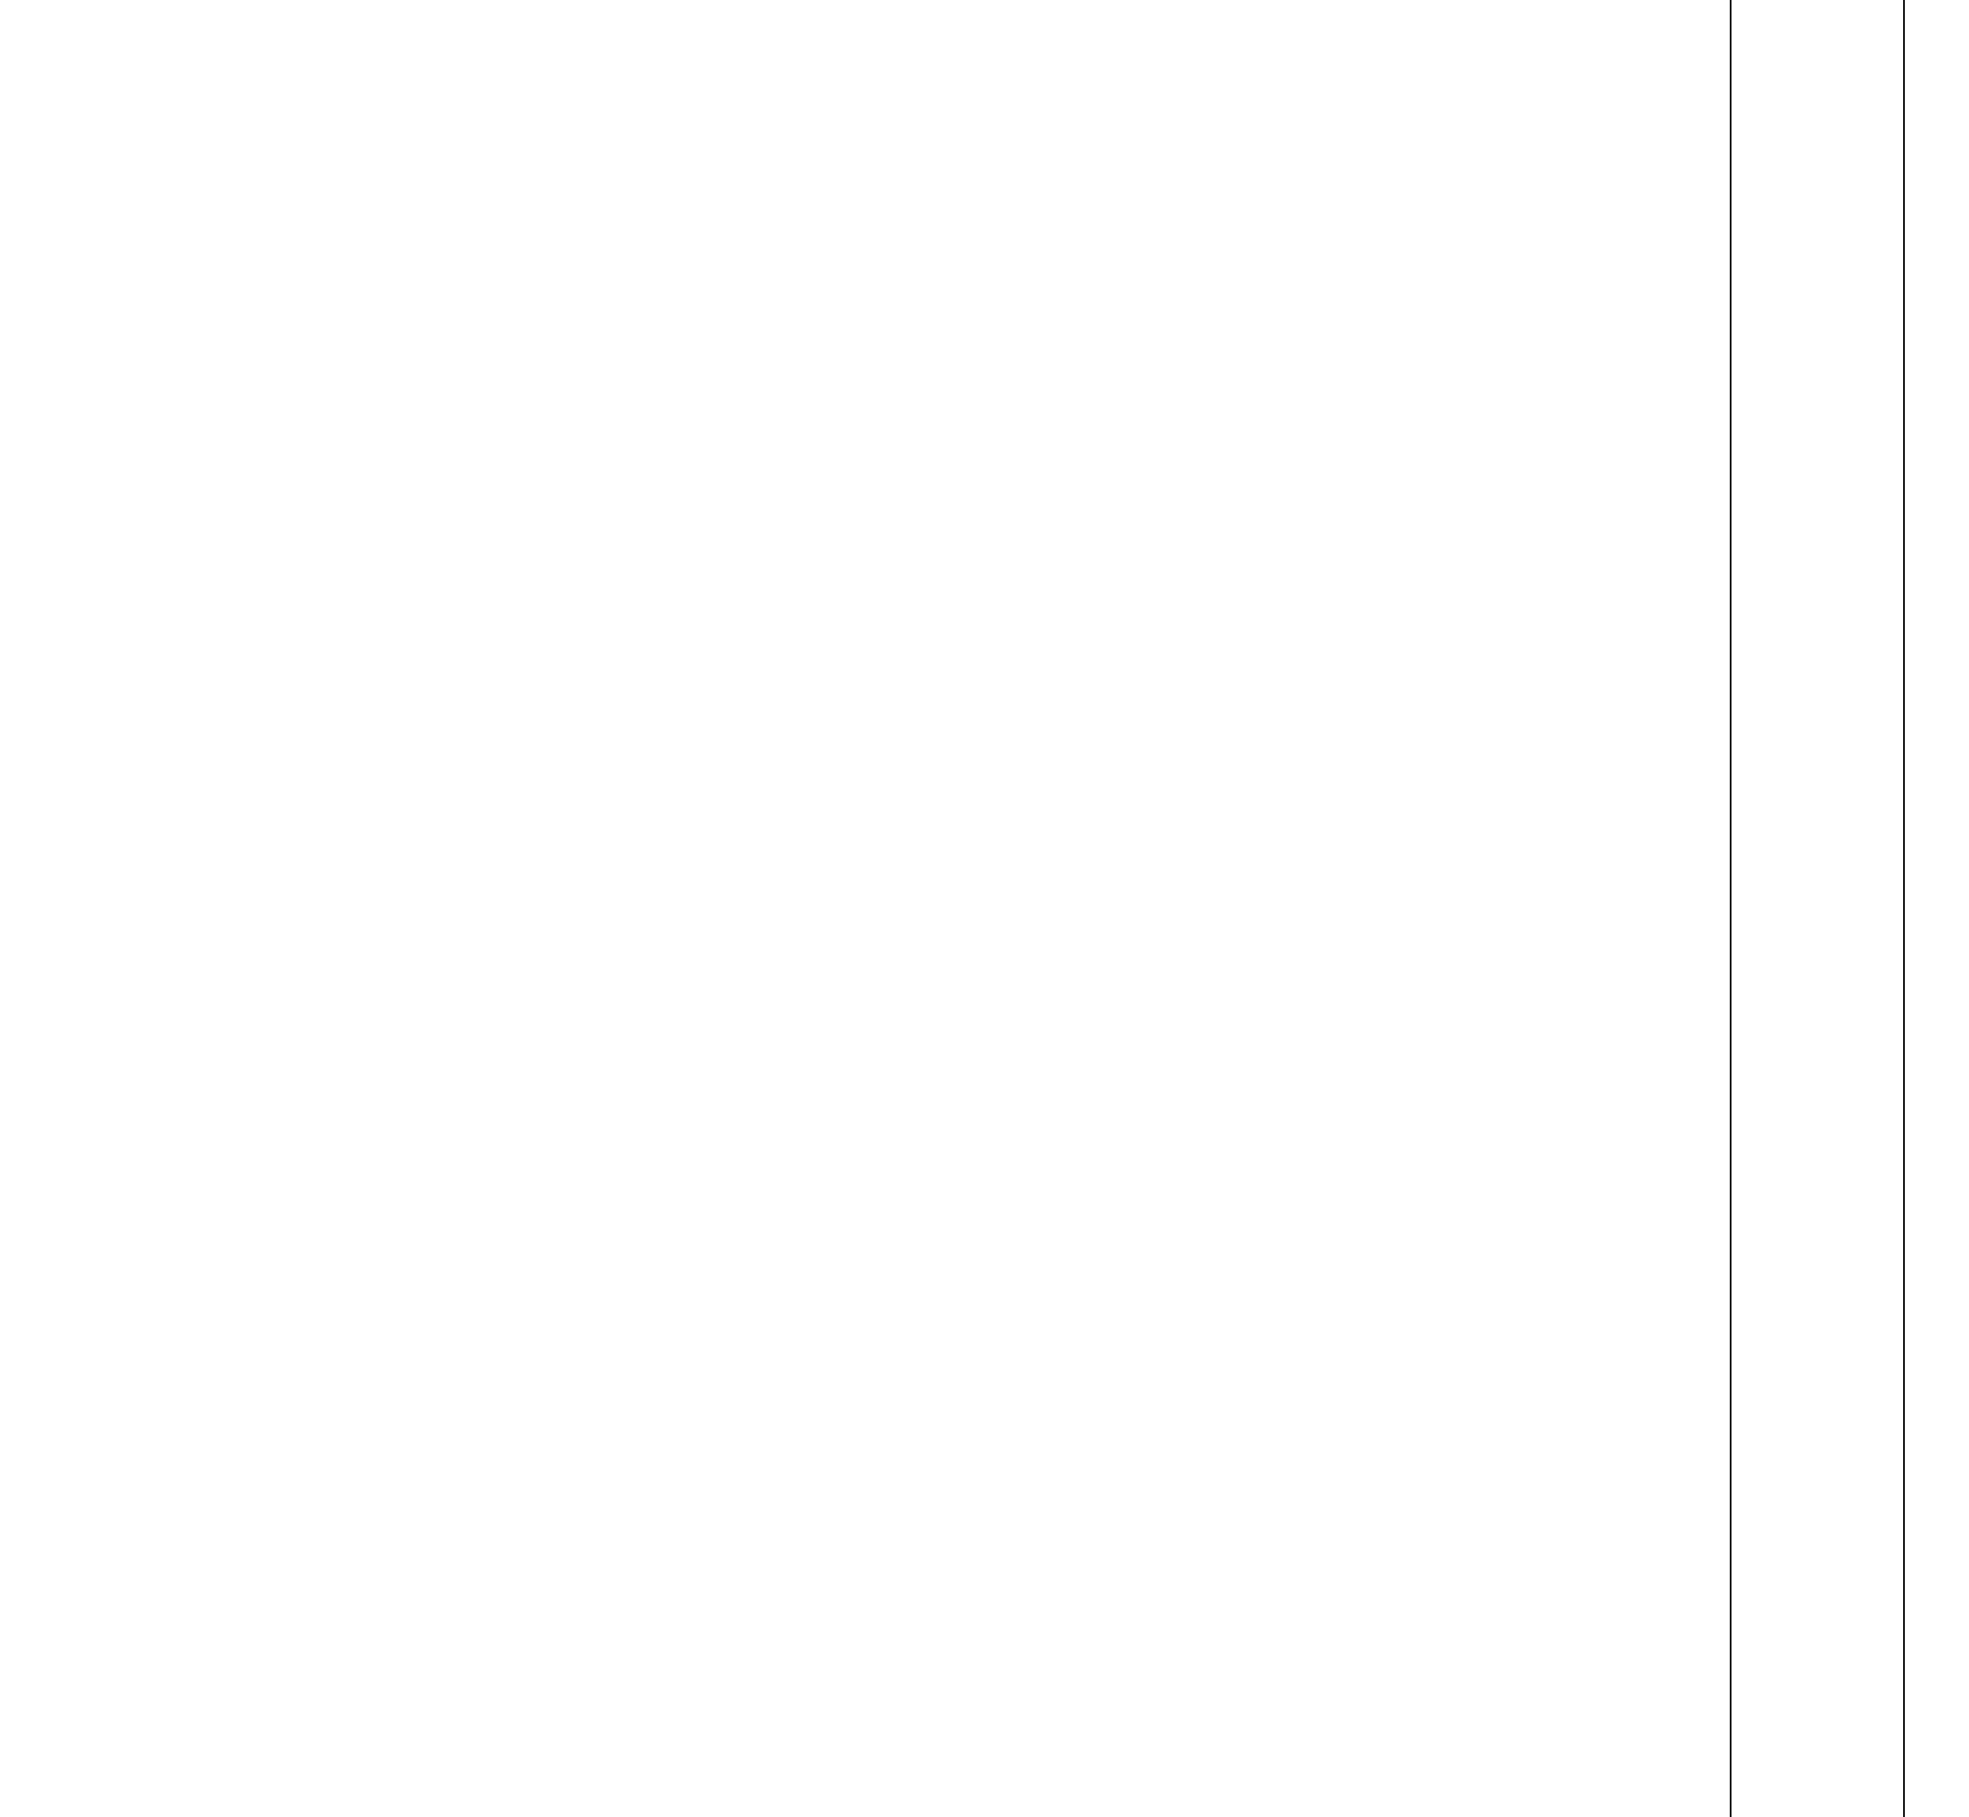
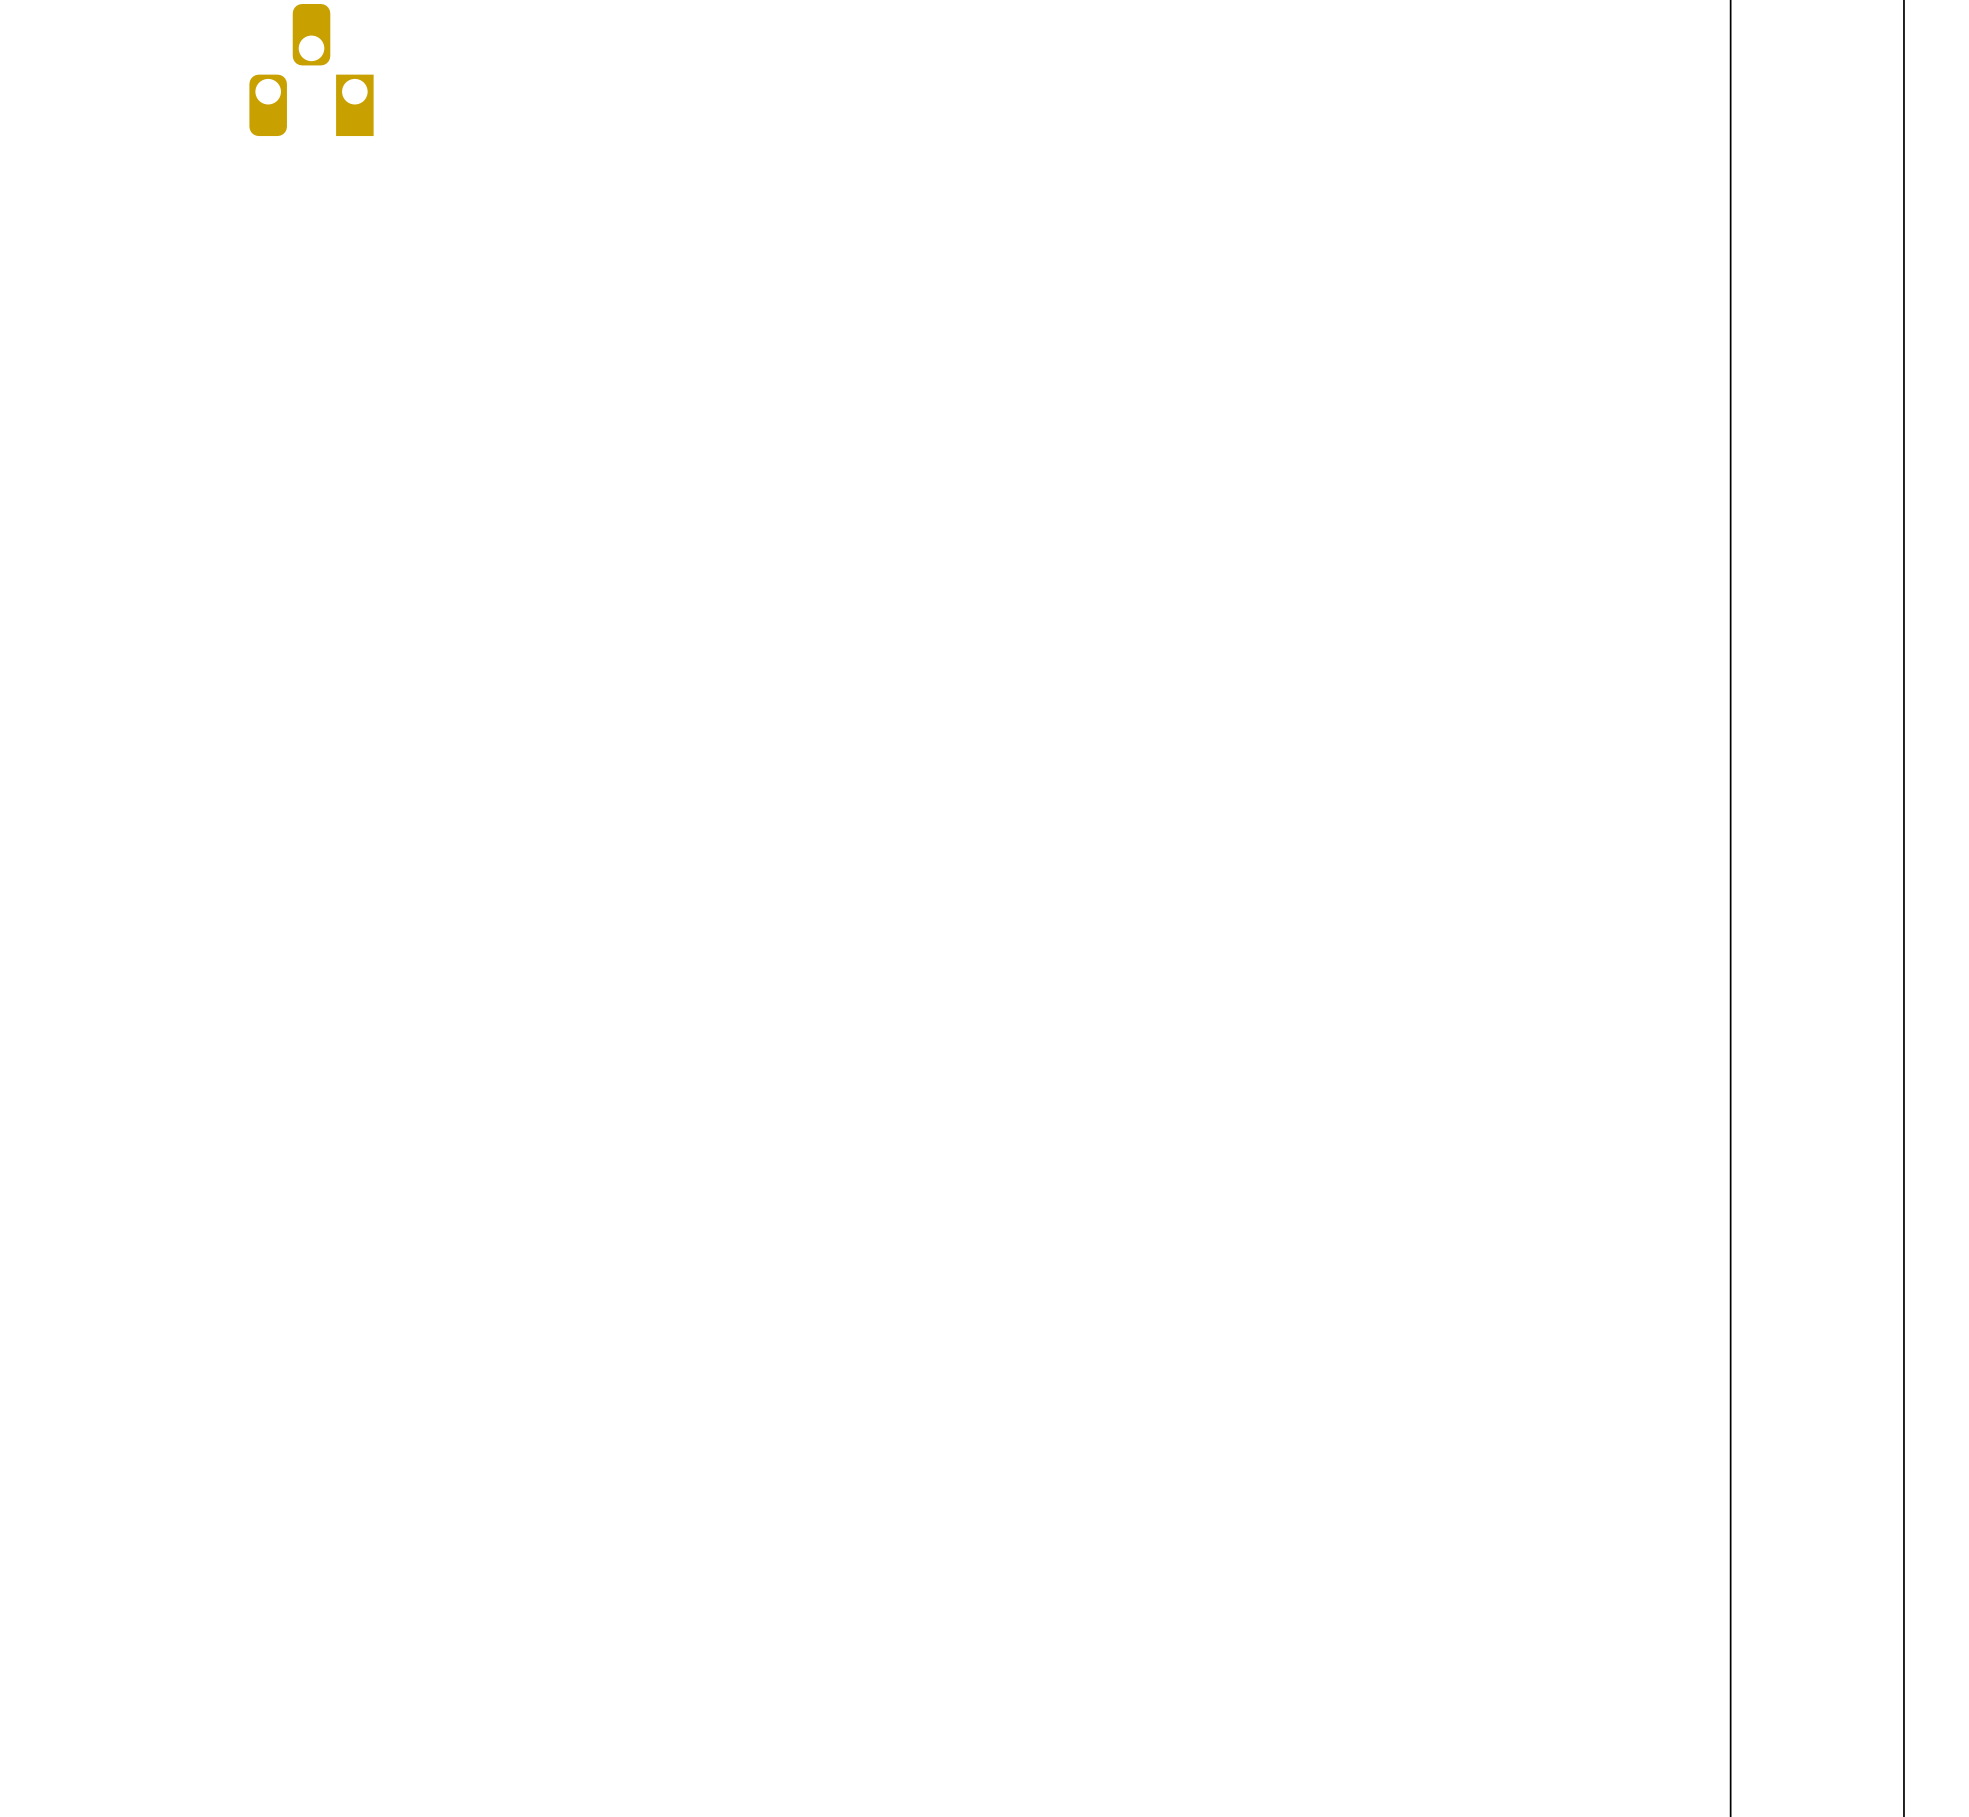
part: none -> (311, 70)

